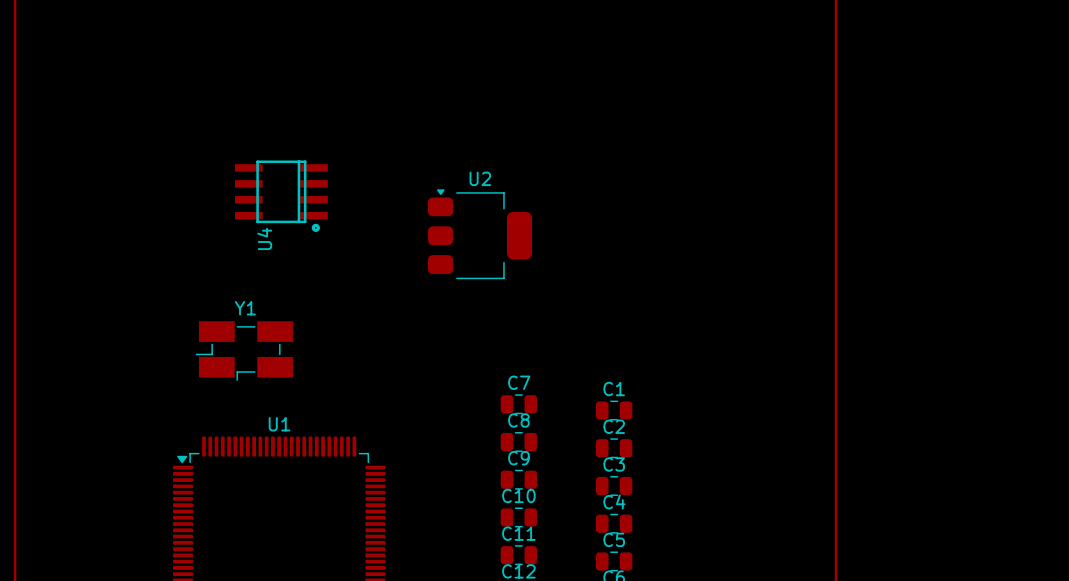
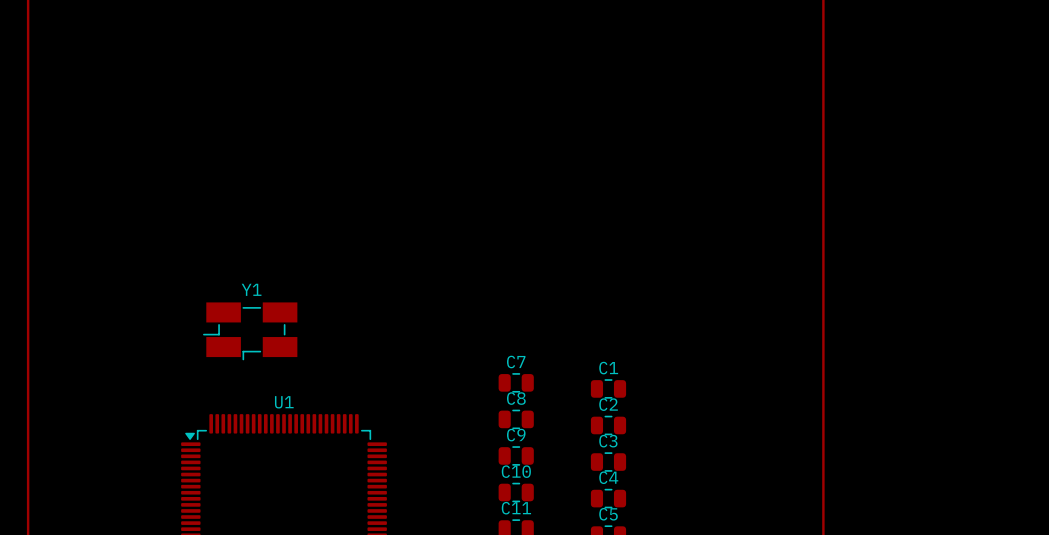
U4: (281, 196) -> none
U2: (480, 234) -> none

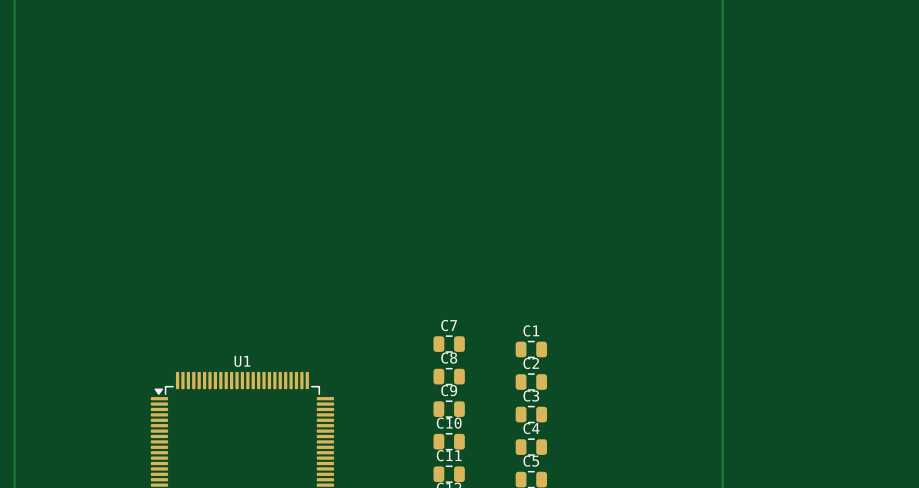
Y1: (250, 331) -> none

